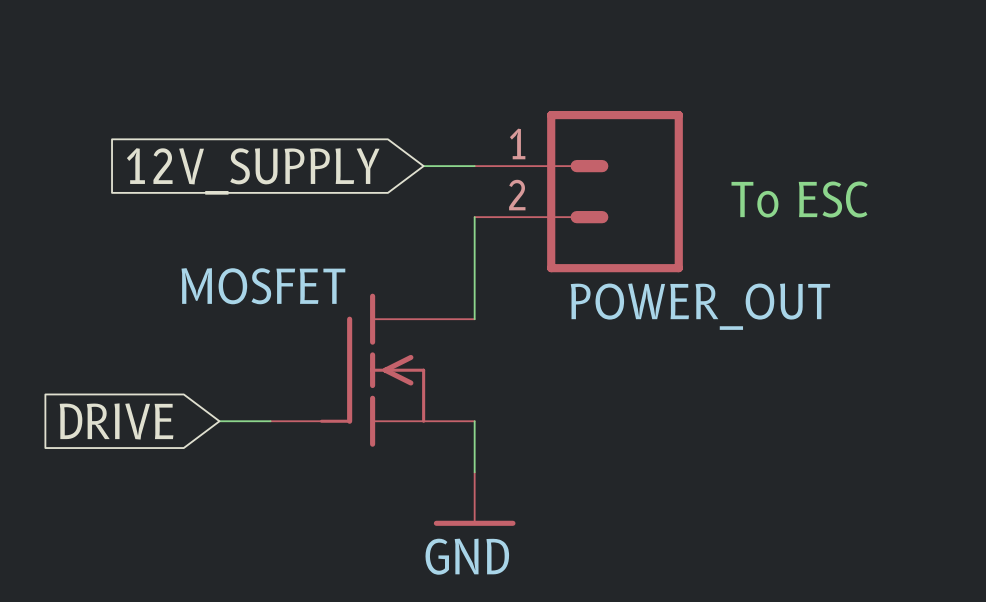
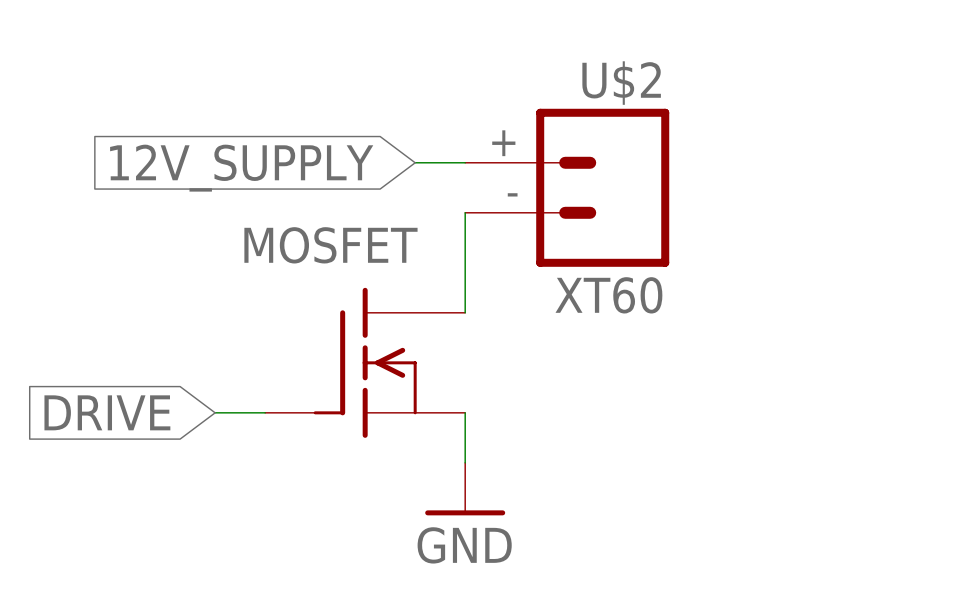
POWER_OUT pin number: 1 (517, 144) -> + (503, 143)
POWER_OUT pin number: 2 (517, 195) -> - (512, 194)
text: To ESC (799, 199) -> none
MOSFET name position: MOSFET (263, 286) -> MOSFET (330, 245)
POWER_OUT value: none -> XT60 (608, 295)
POWER_OUT name: POWER_OUT (700, 306) -> U$2 (621, 83)

